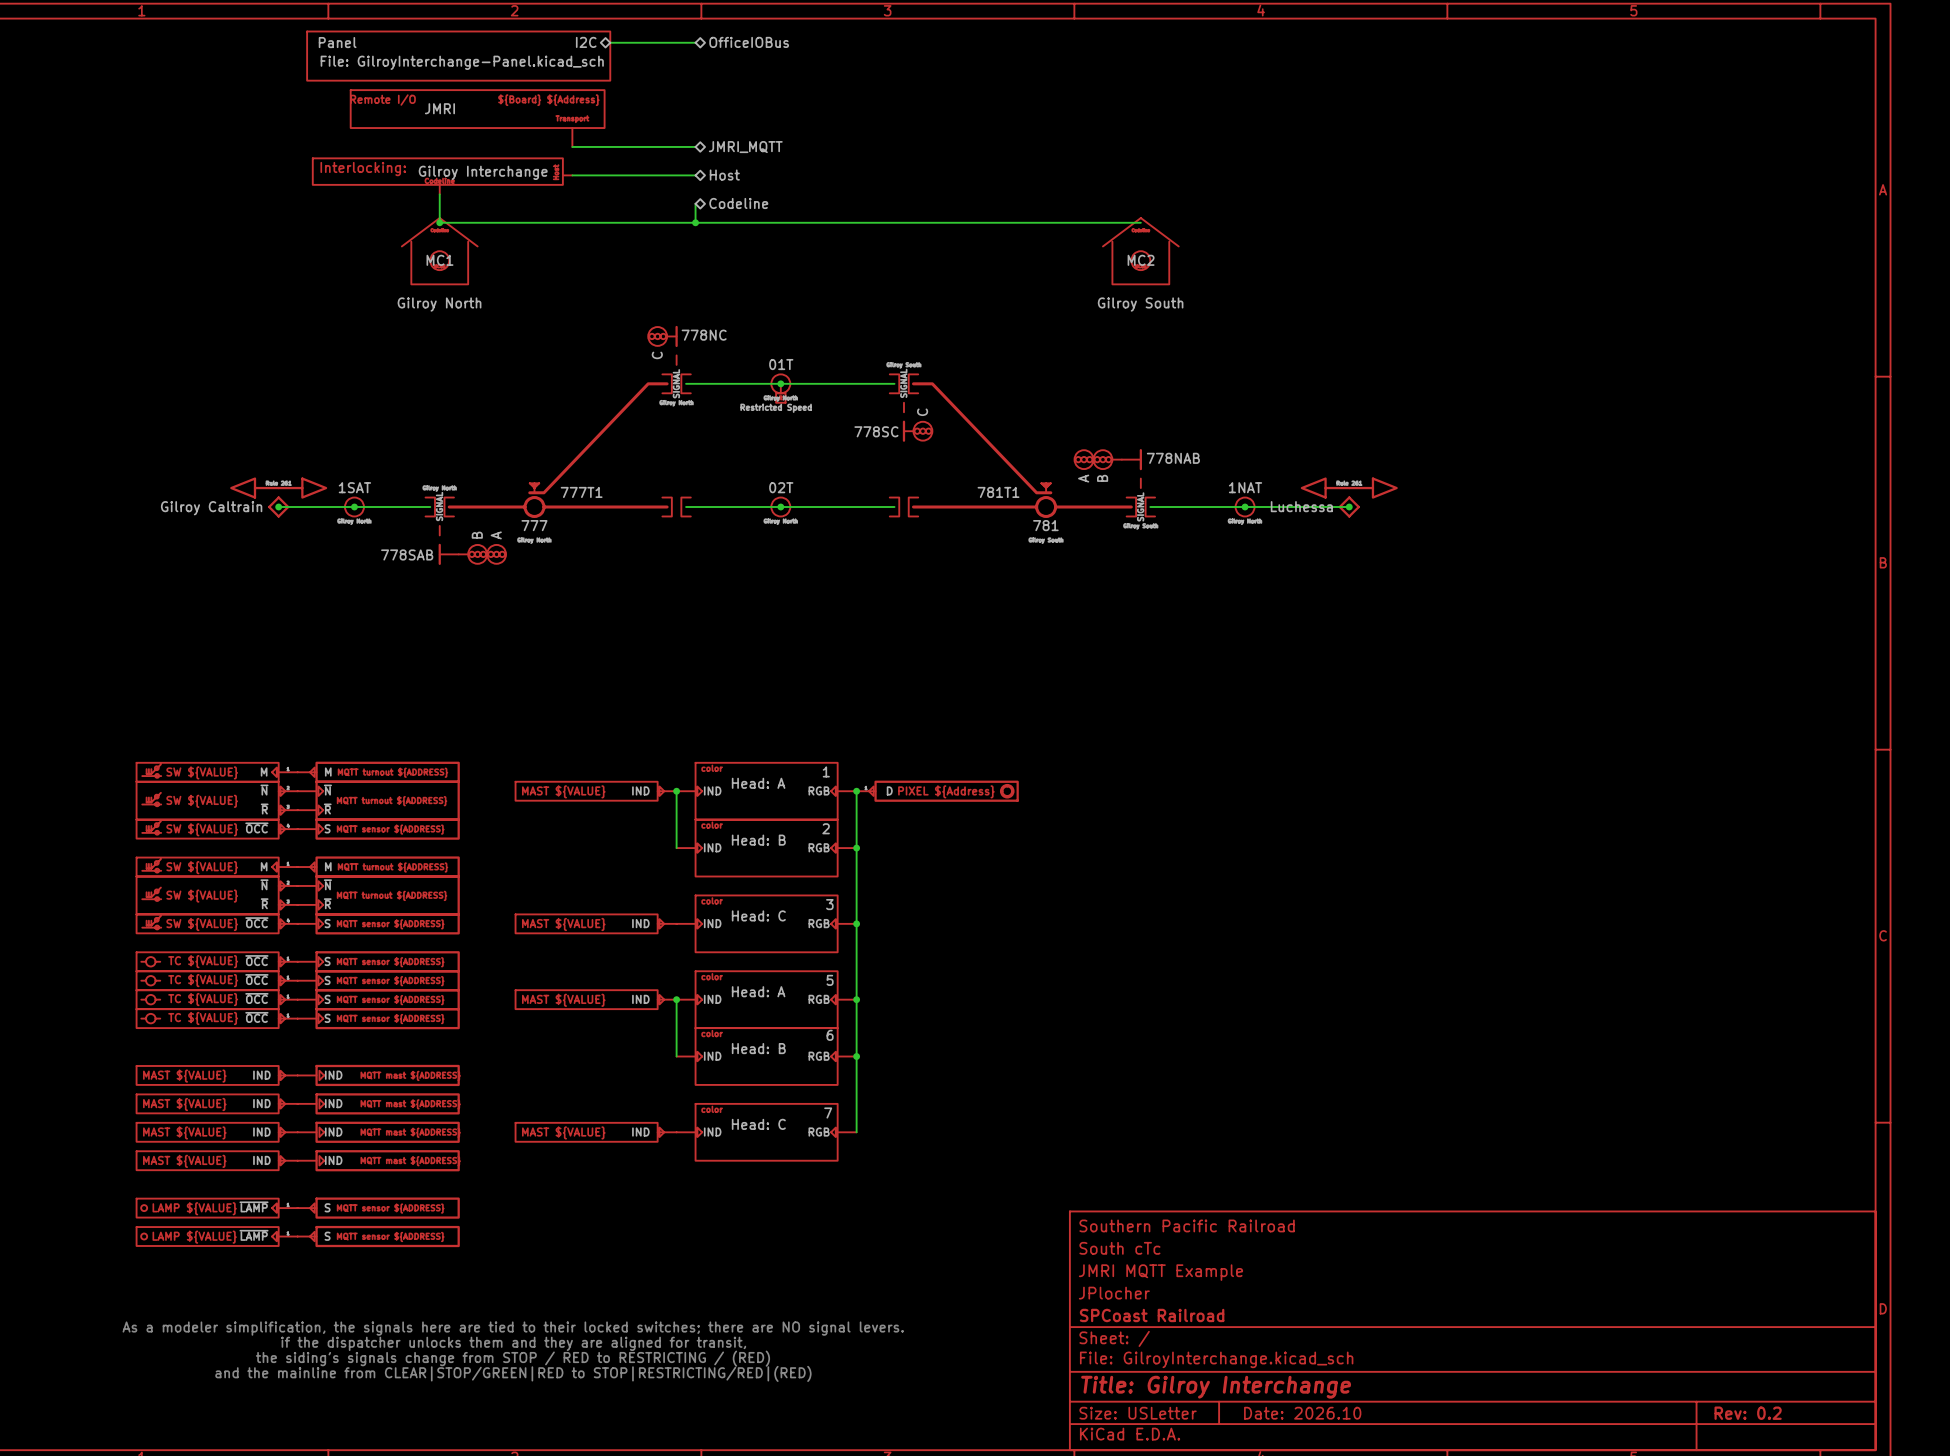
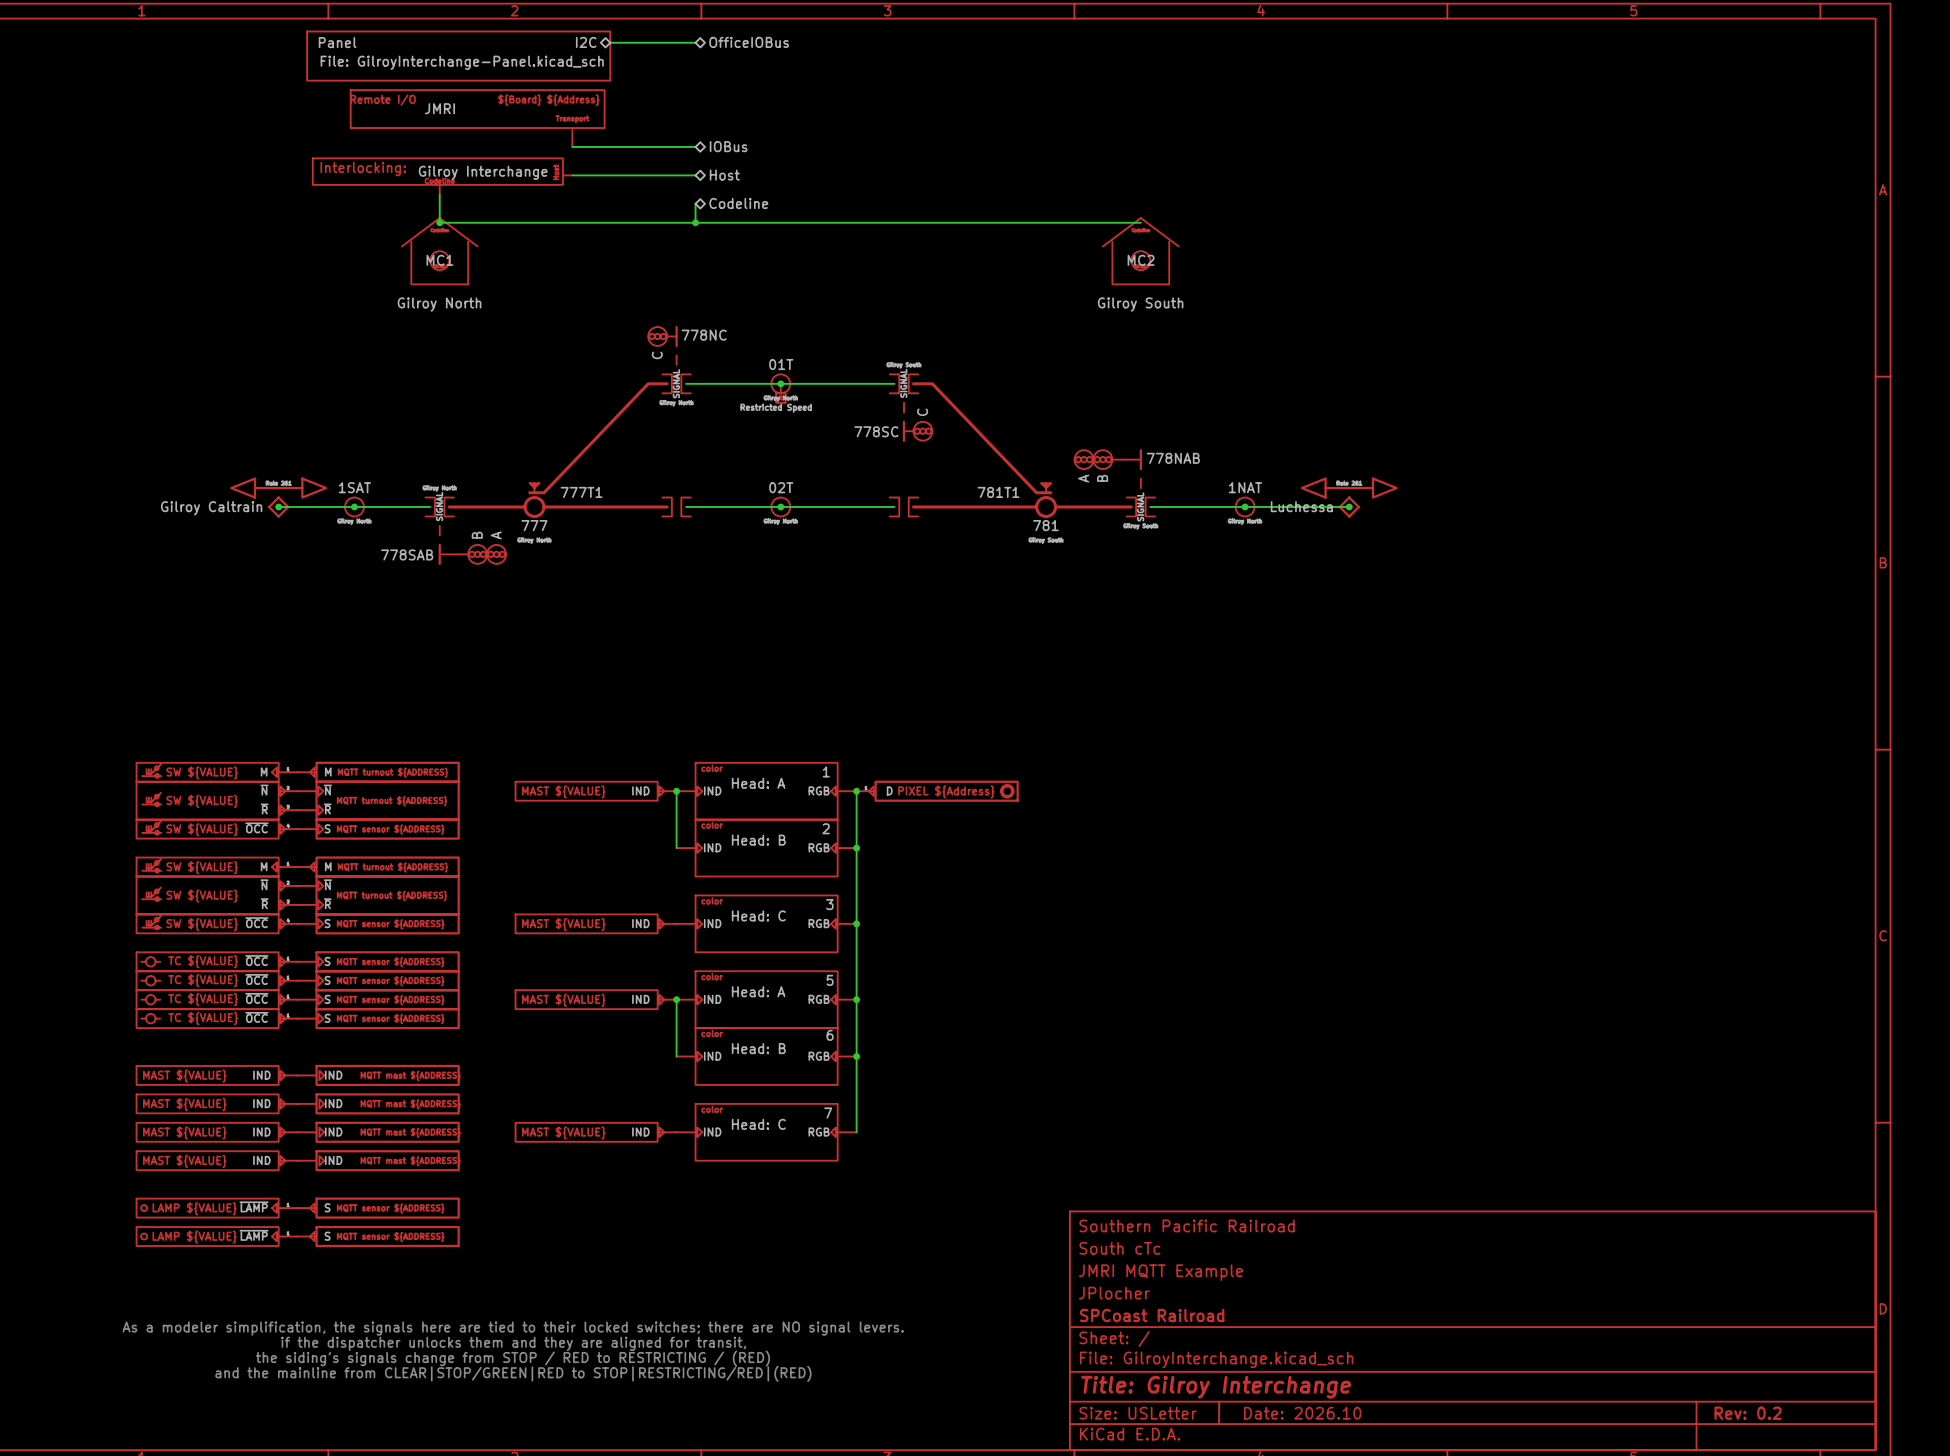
hierarchical label: JMRI_MQTT (745, 147) -> IOBus (728, 146)

